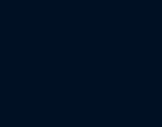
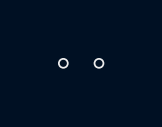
via: none -> (63, 63)
via: none -> (98, 63)

